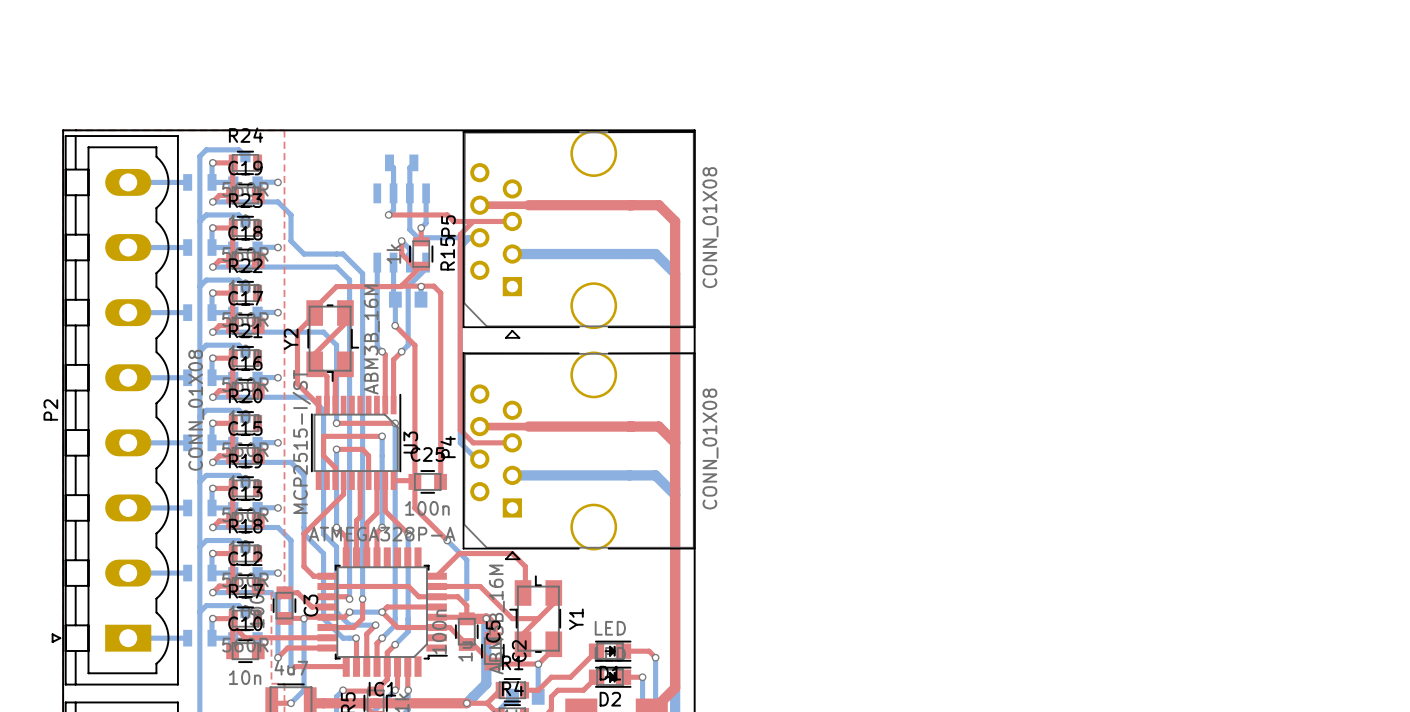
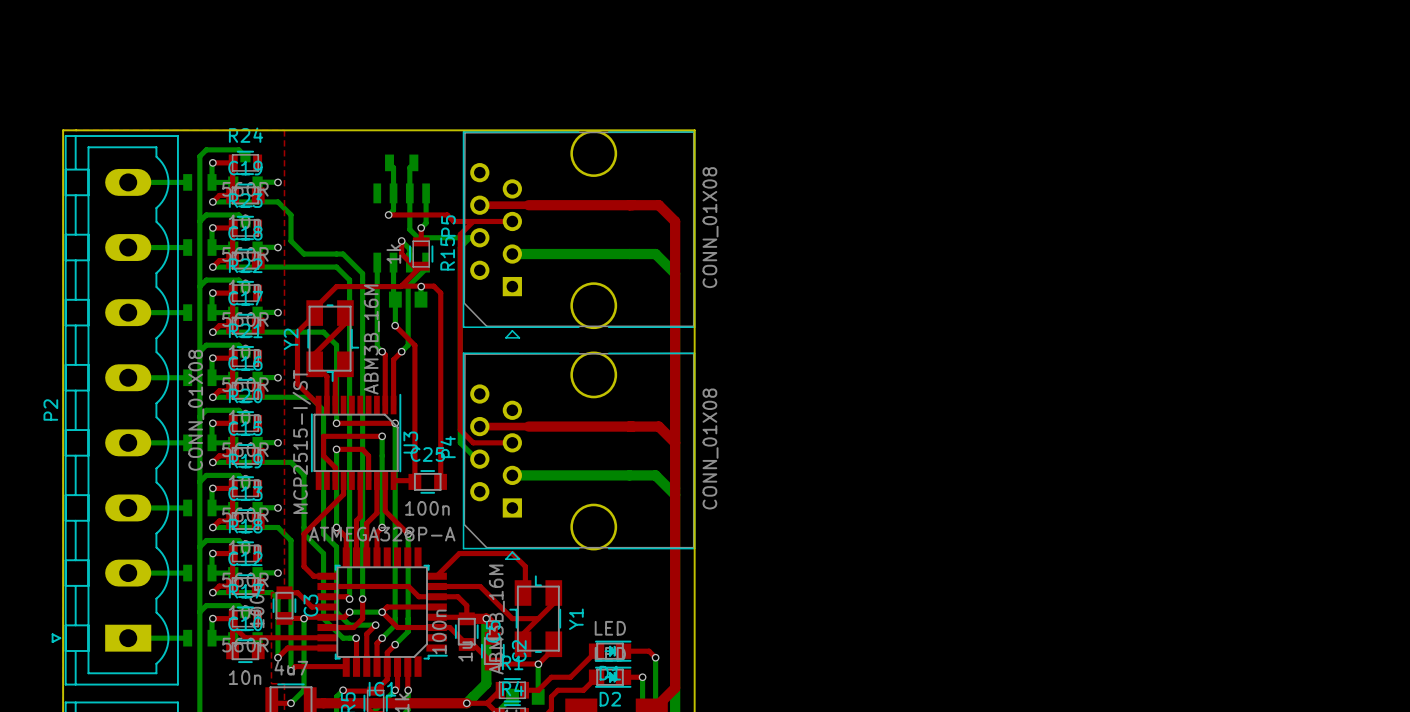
top track: (414, 481) (414, 508) (447, 540) -> none
bottom track: (447, 540) (466, 560) (466, 599) -> none
via: (447, 540) -> none

